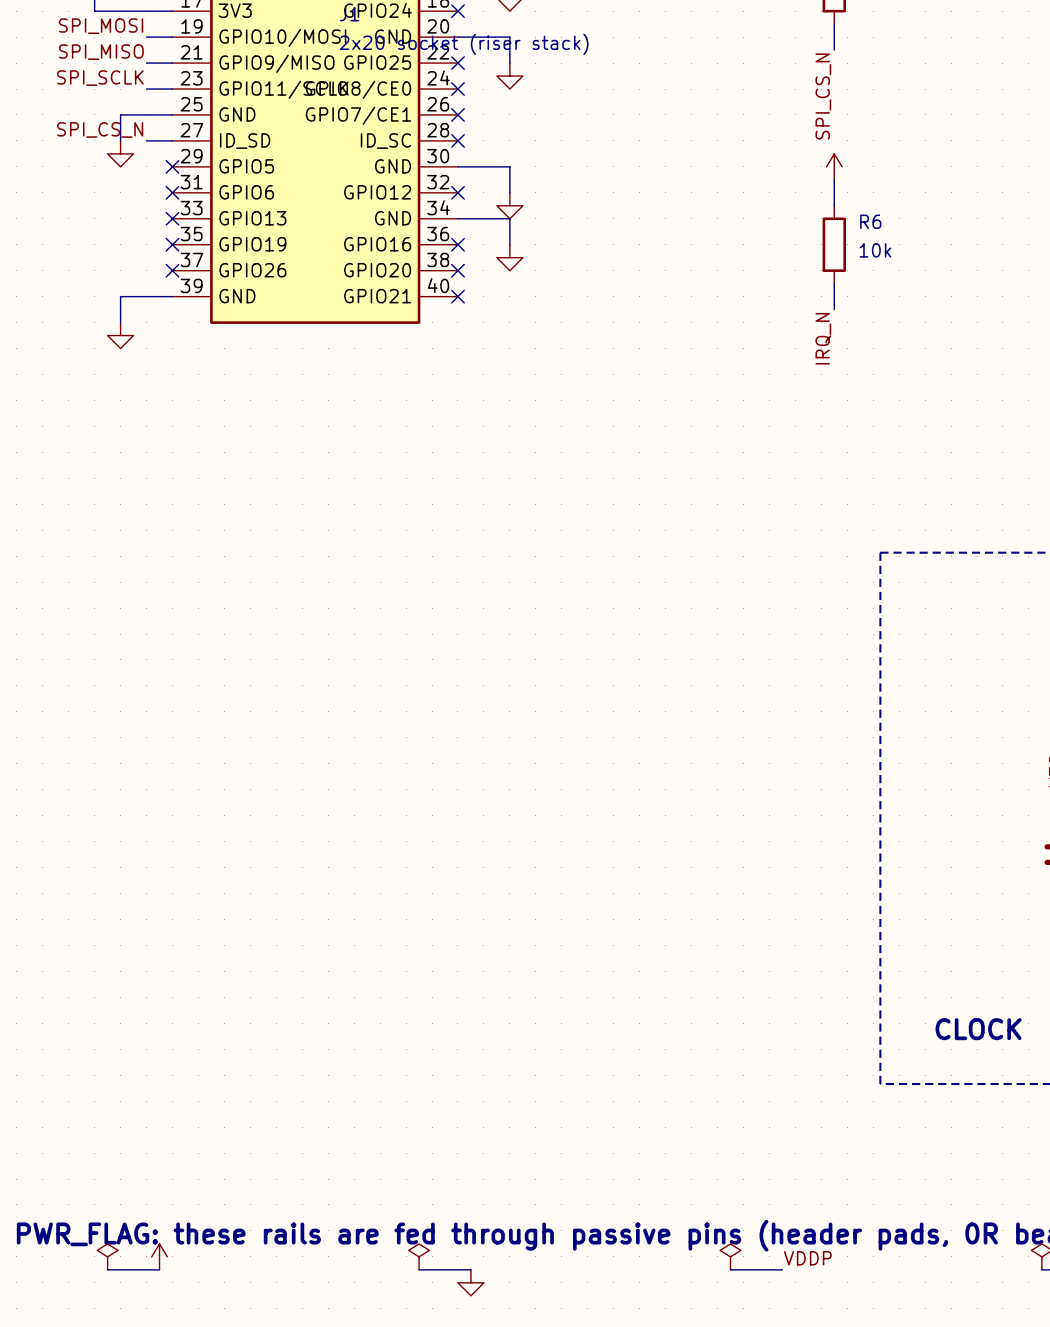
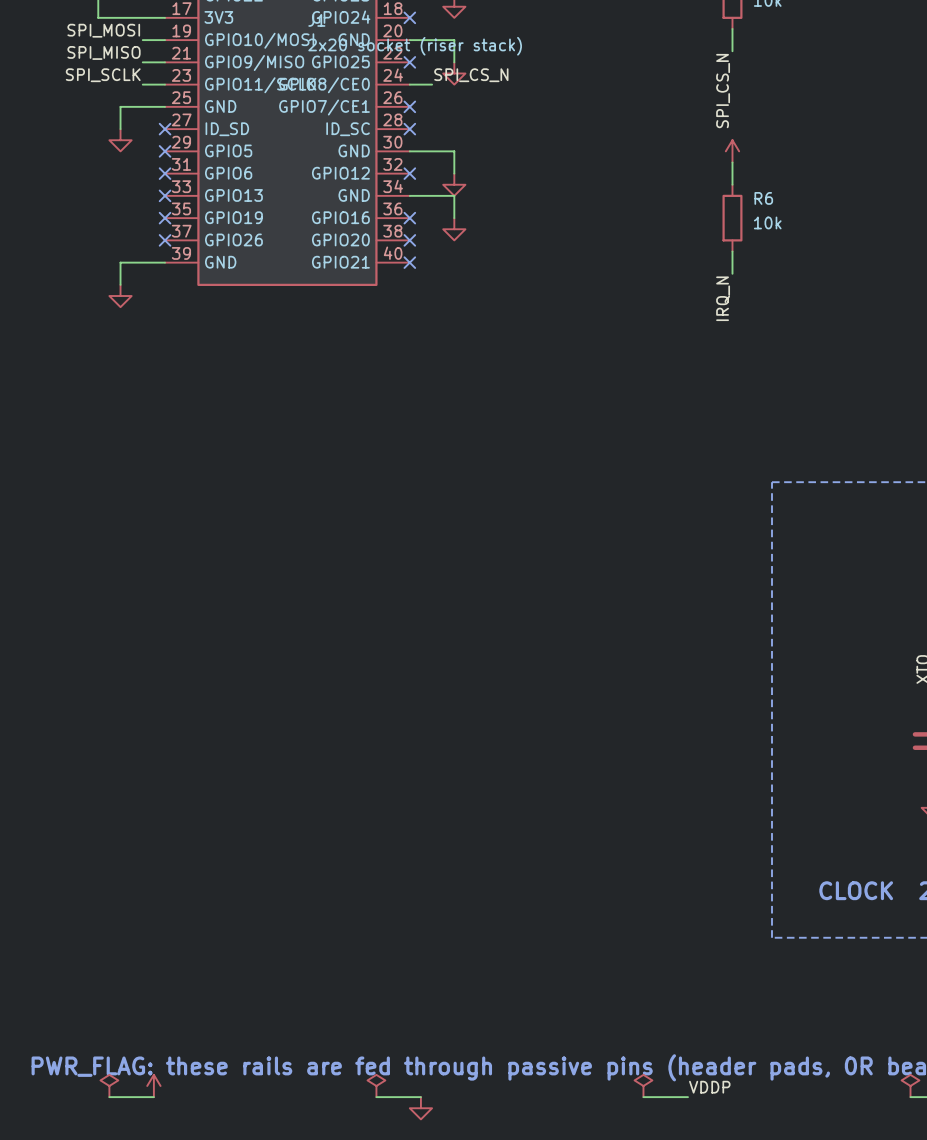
label: none -> SPI_CS_N (471, 75)
wire: none -> (409, 84) (432, 84)
no-connect mark: (457, 89) -> none
label: SPI_CS_N (100, 129) -> none
wire: (146, 140) (172, 140) -> none
no-connect mark: none -> (165, 129)

